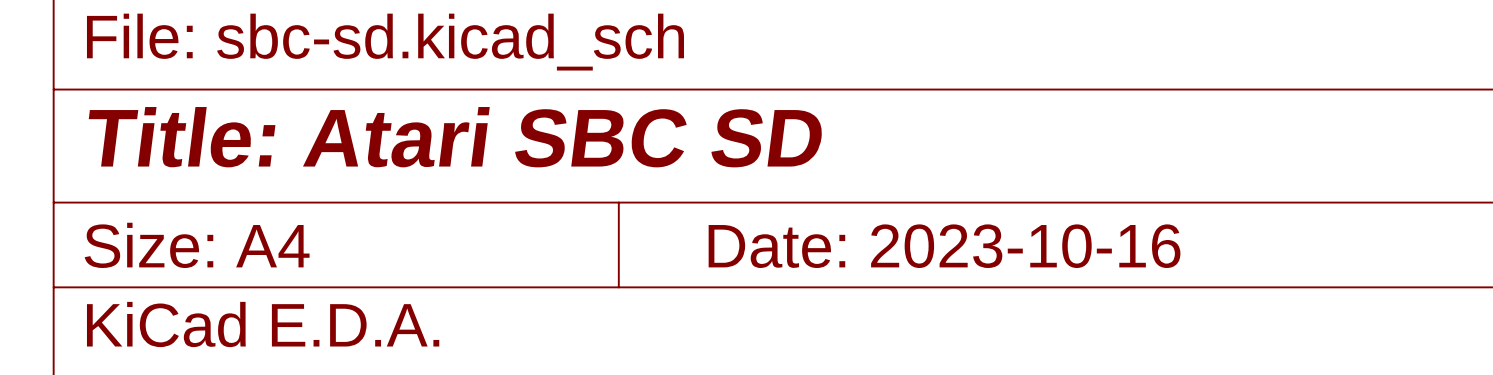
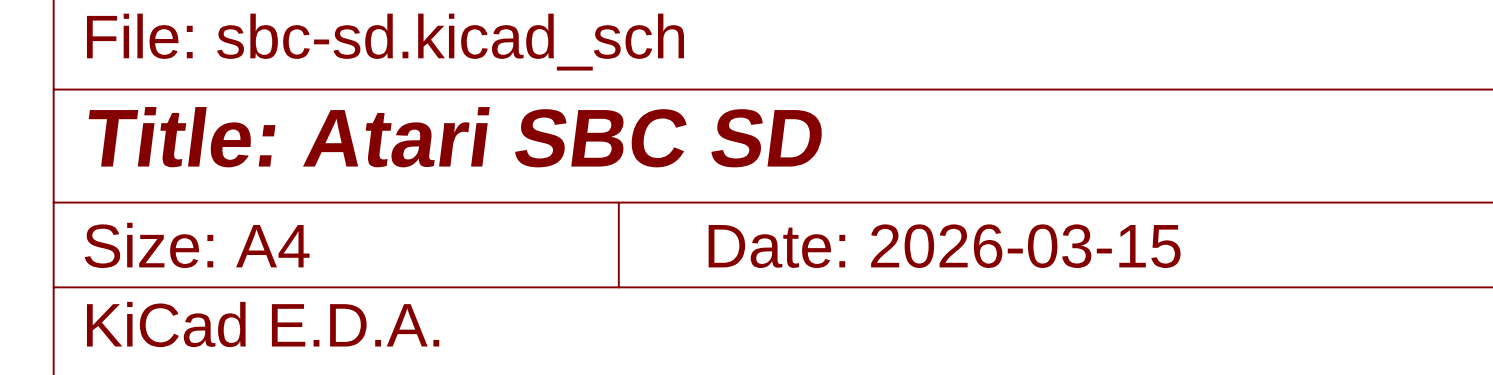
title block: Date: 2023-10-16 (944, 246) -> Date: 2026-03-15 (944, 246)

